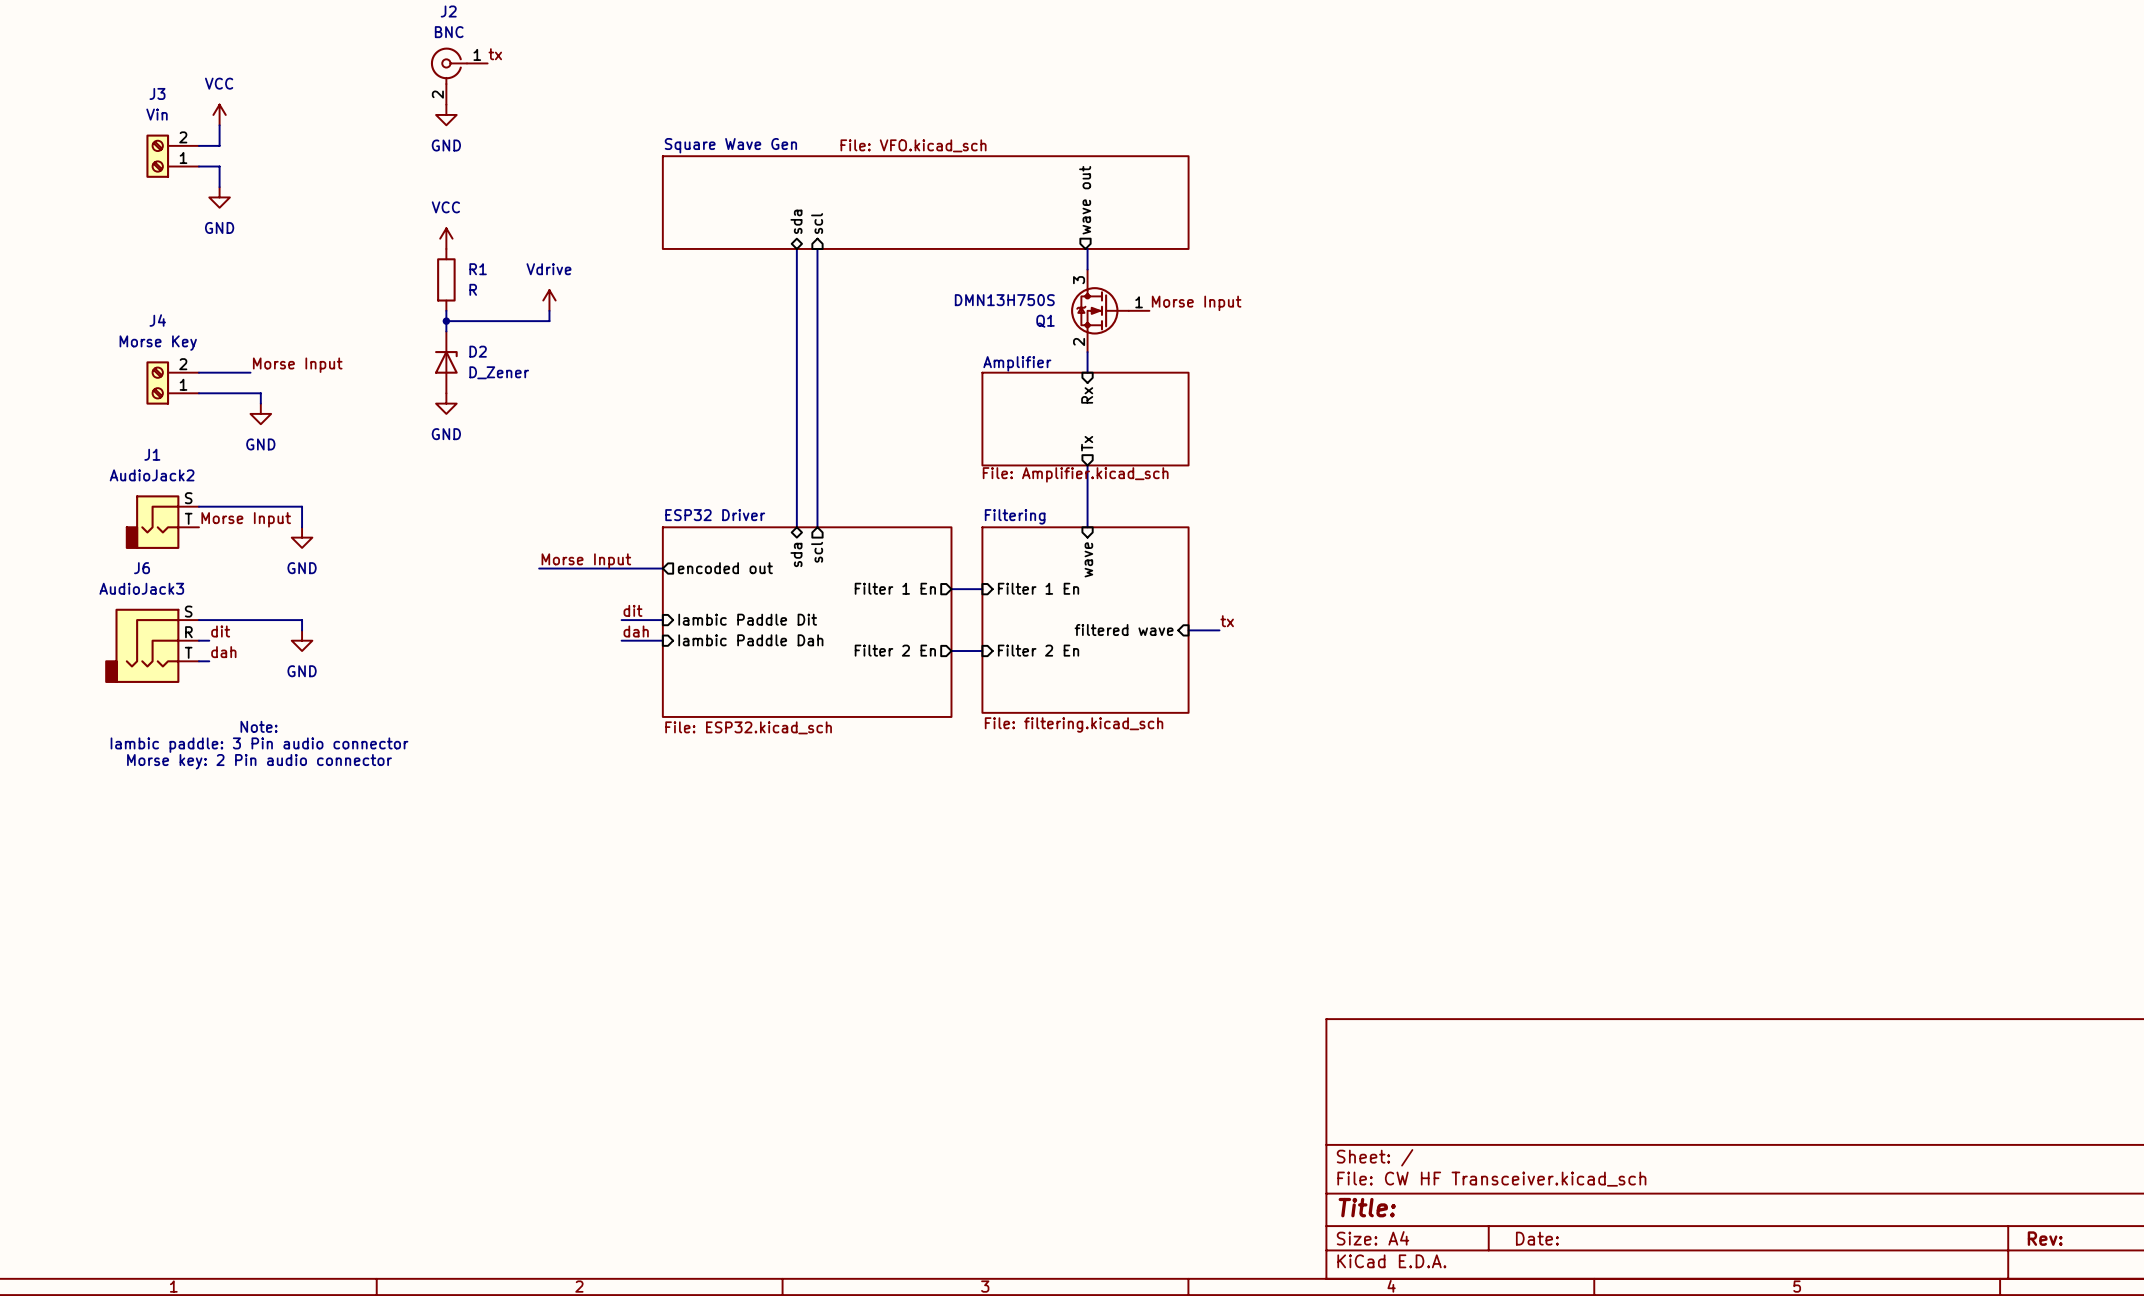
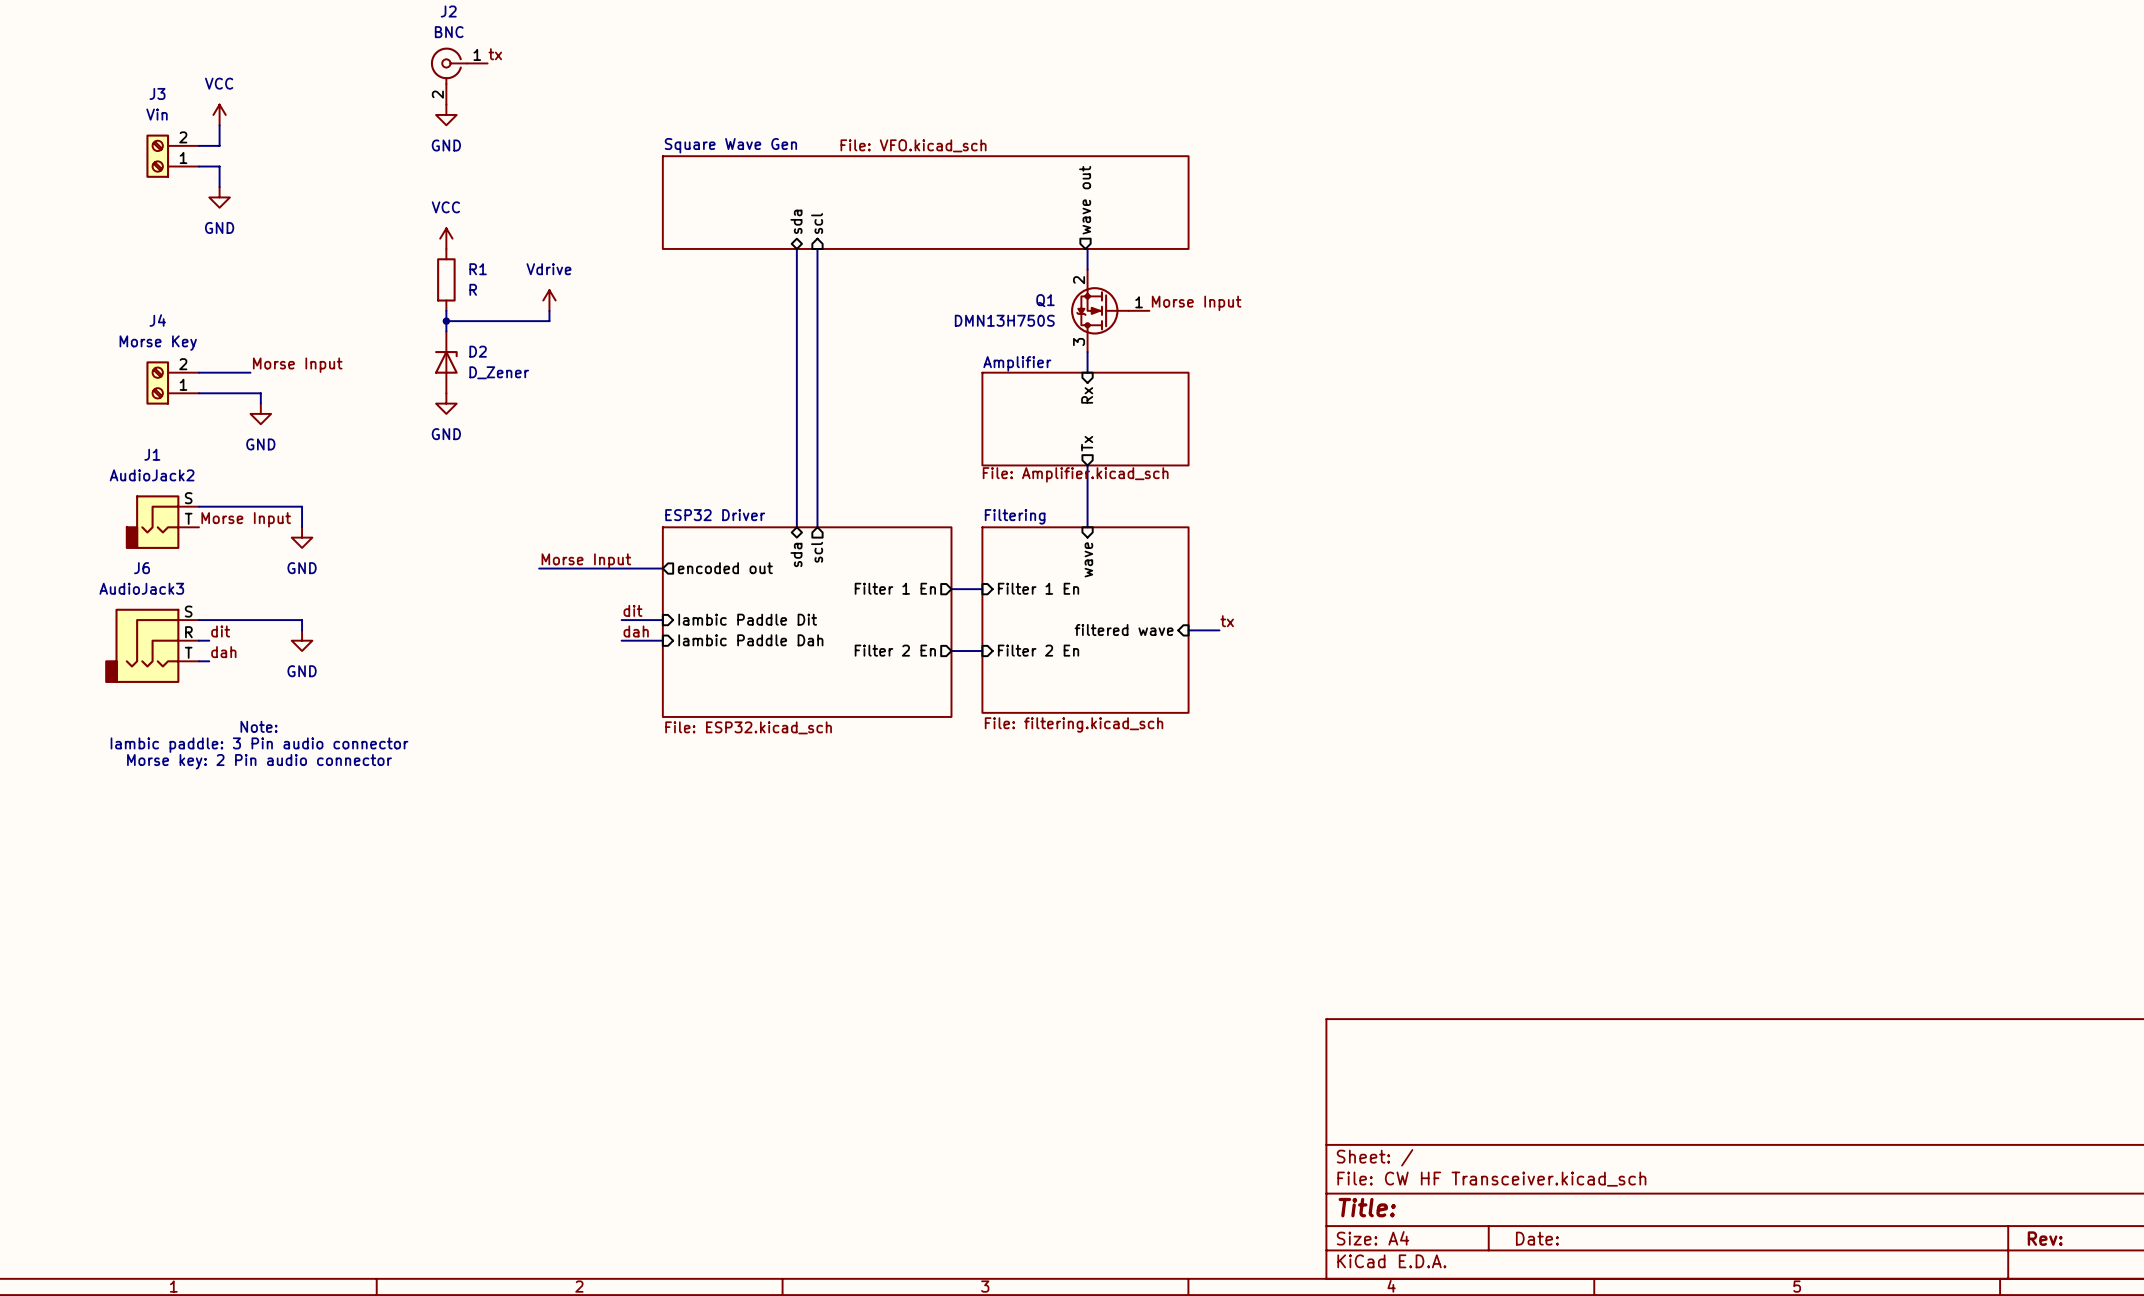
Q1 flip: as is (1099, 310) -> up-down (1099, 310)

